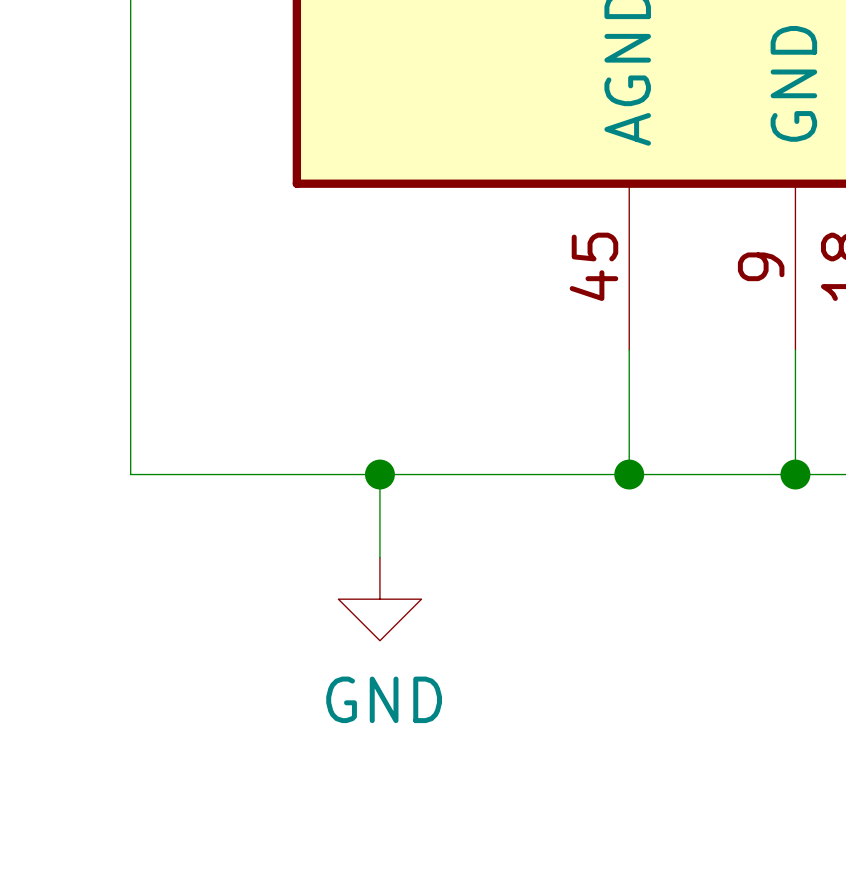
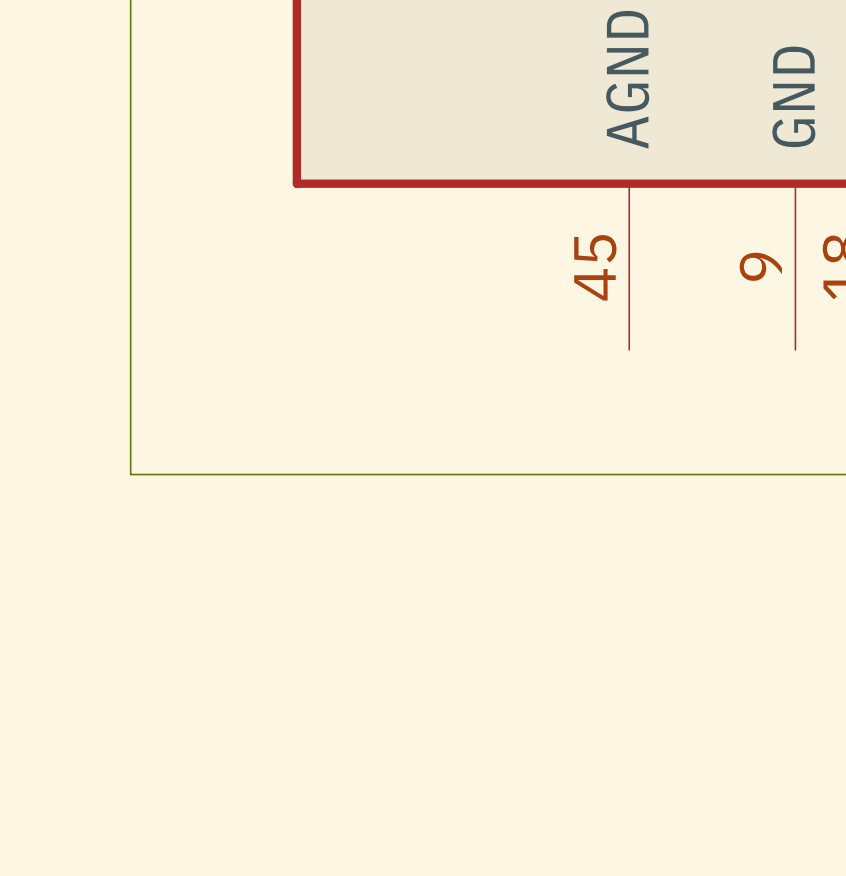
wire: (629, 349) (629, 474) -> none
wire: (795, 349) (795, 474) -> none
wire: (379, 474) (379, 557) -> none
junction: (379, 474) -> none
junction: (629, 474) -> none
junction: (795, 474) -> none
power symbol: GND (379, 599) -> none

